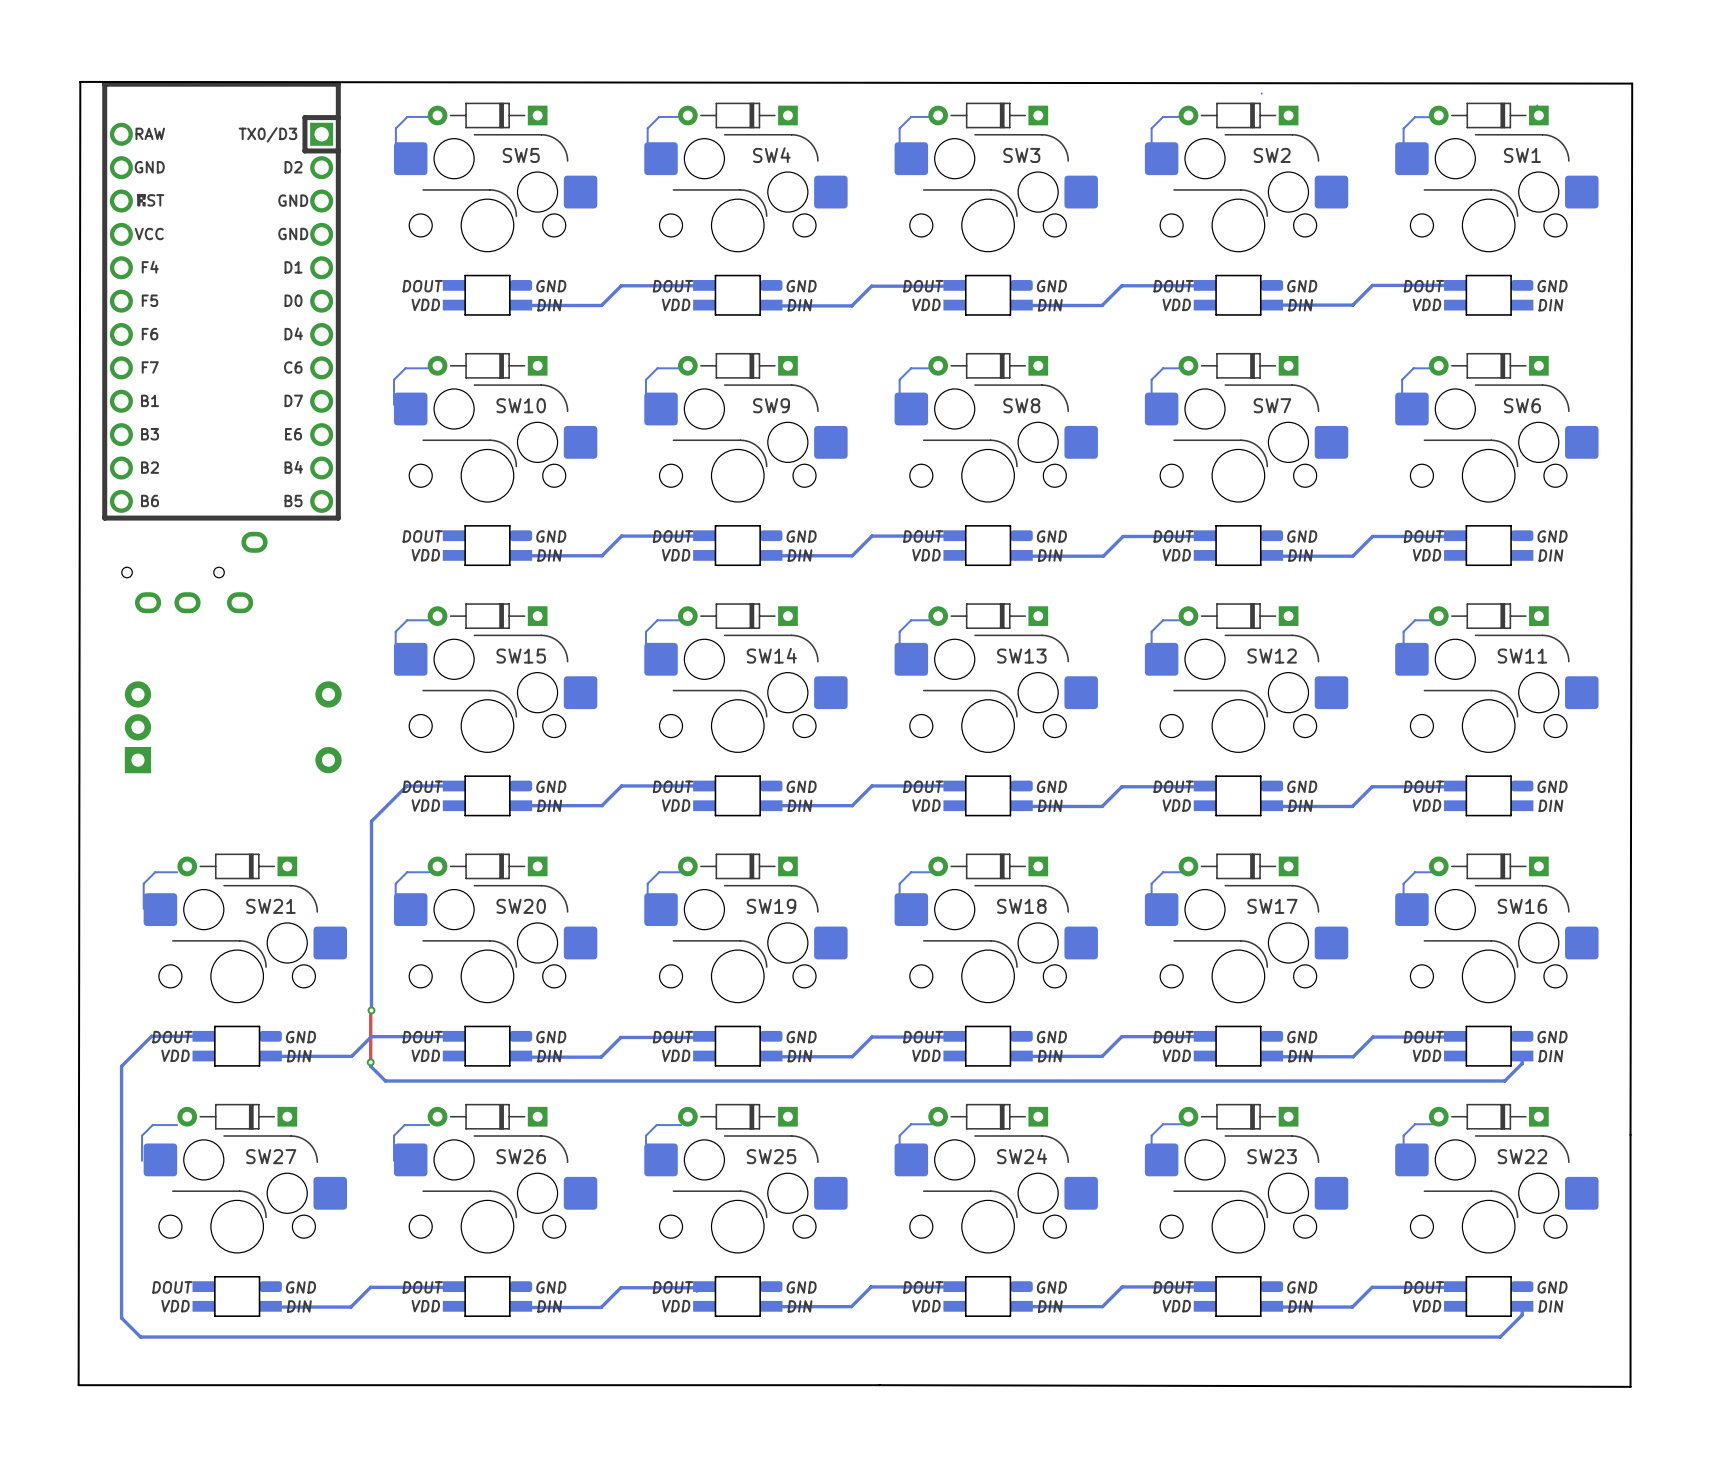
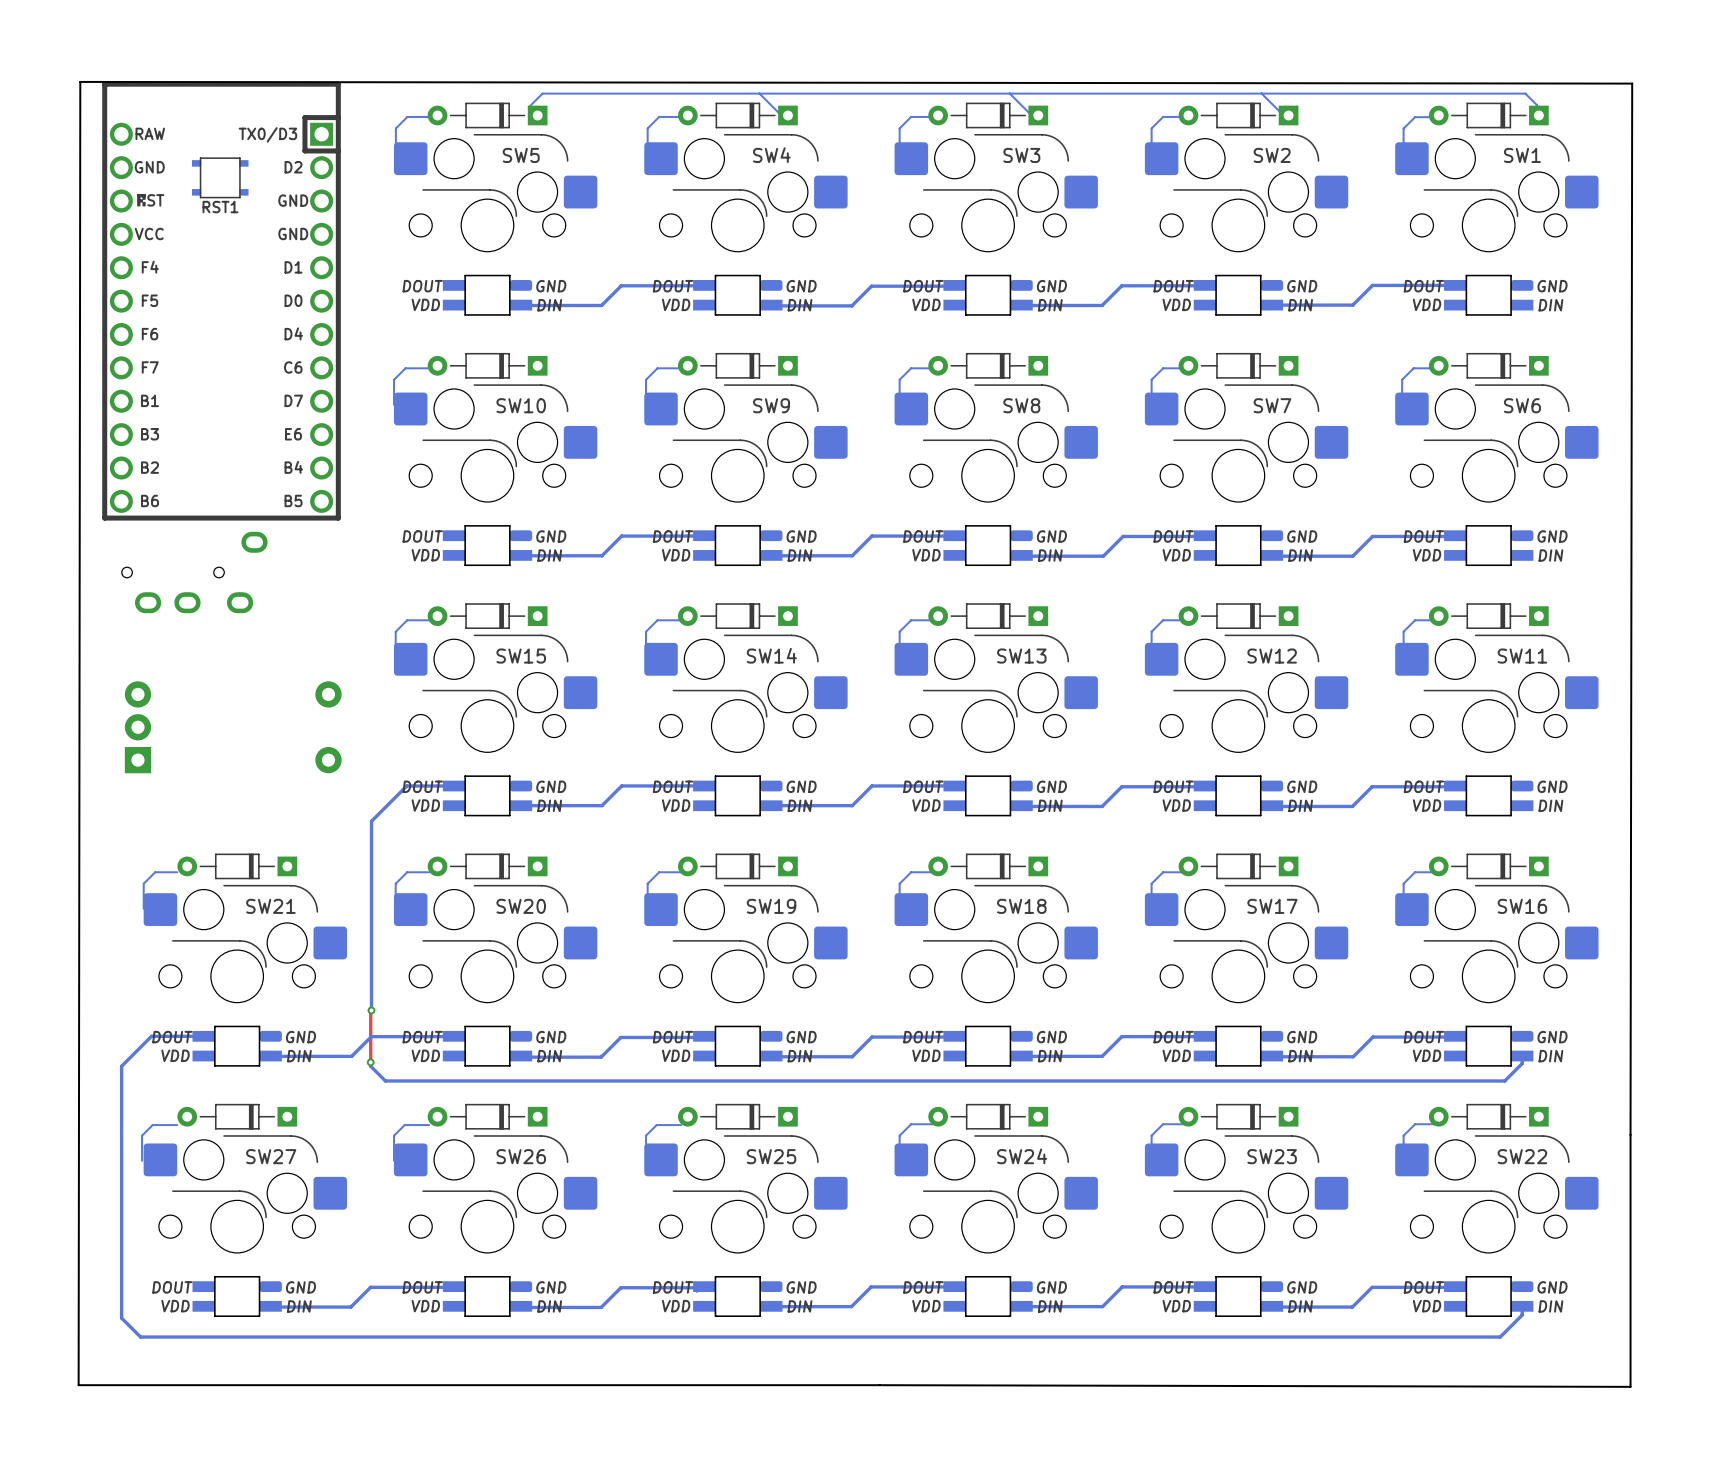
bottom track: none -> (759, 93) (781, 115)
bottom track: none -> (1009, 93) (1033, 117)
bottom track: none -> (1261, 93) (1285, 117)
bottom track: none -> (1537, 105) (1525, 93) (542, 93) (529, 106)
RST1: none -> (220, 177)

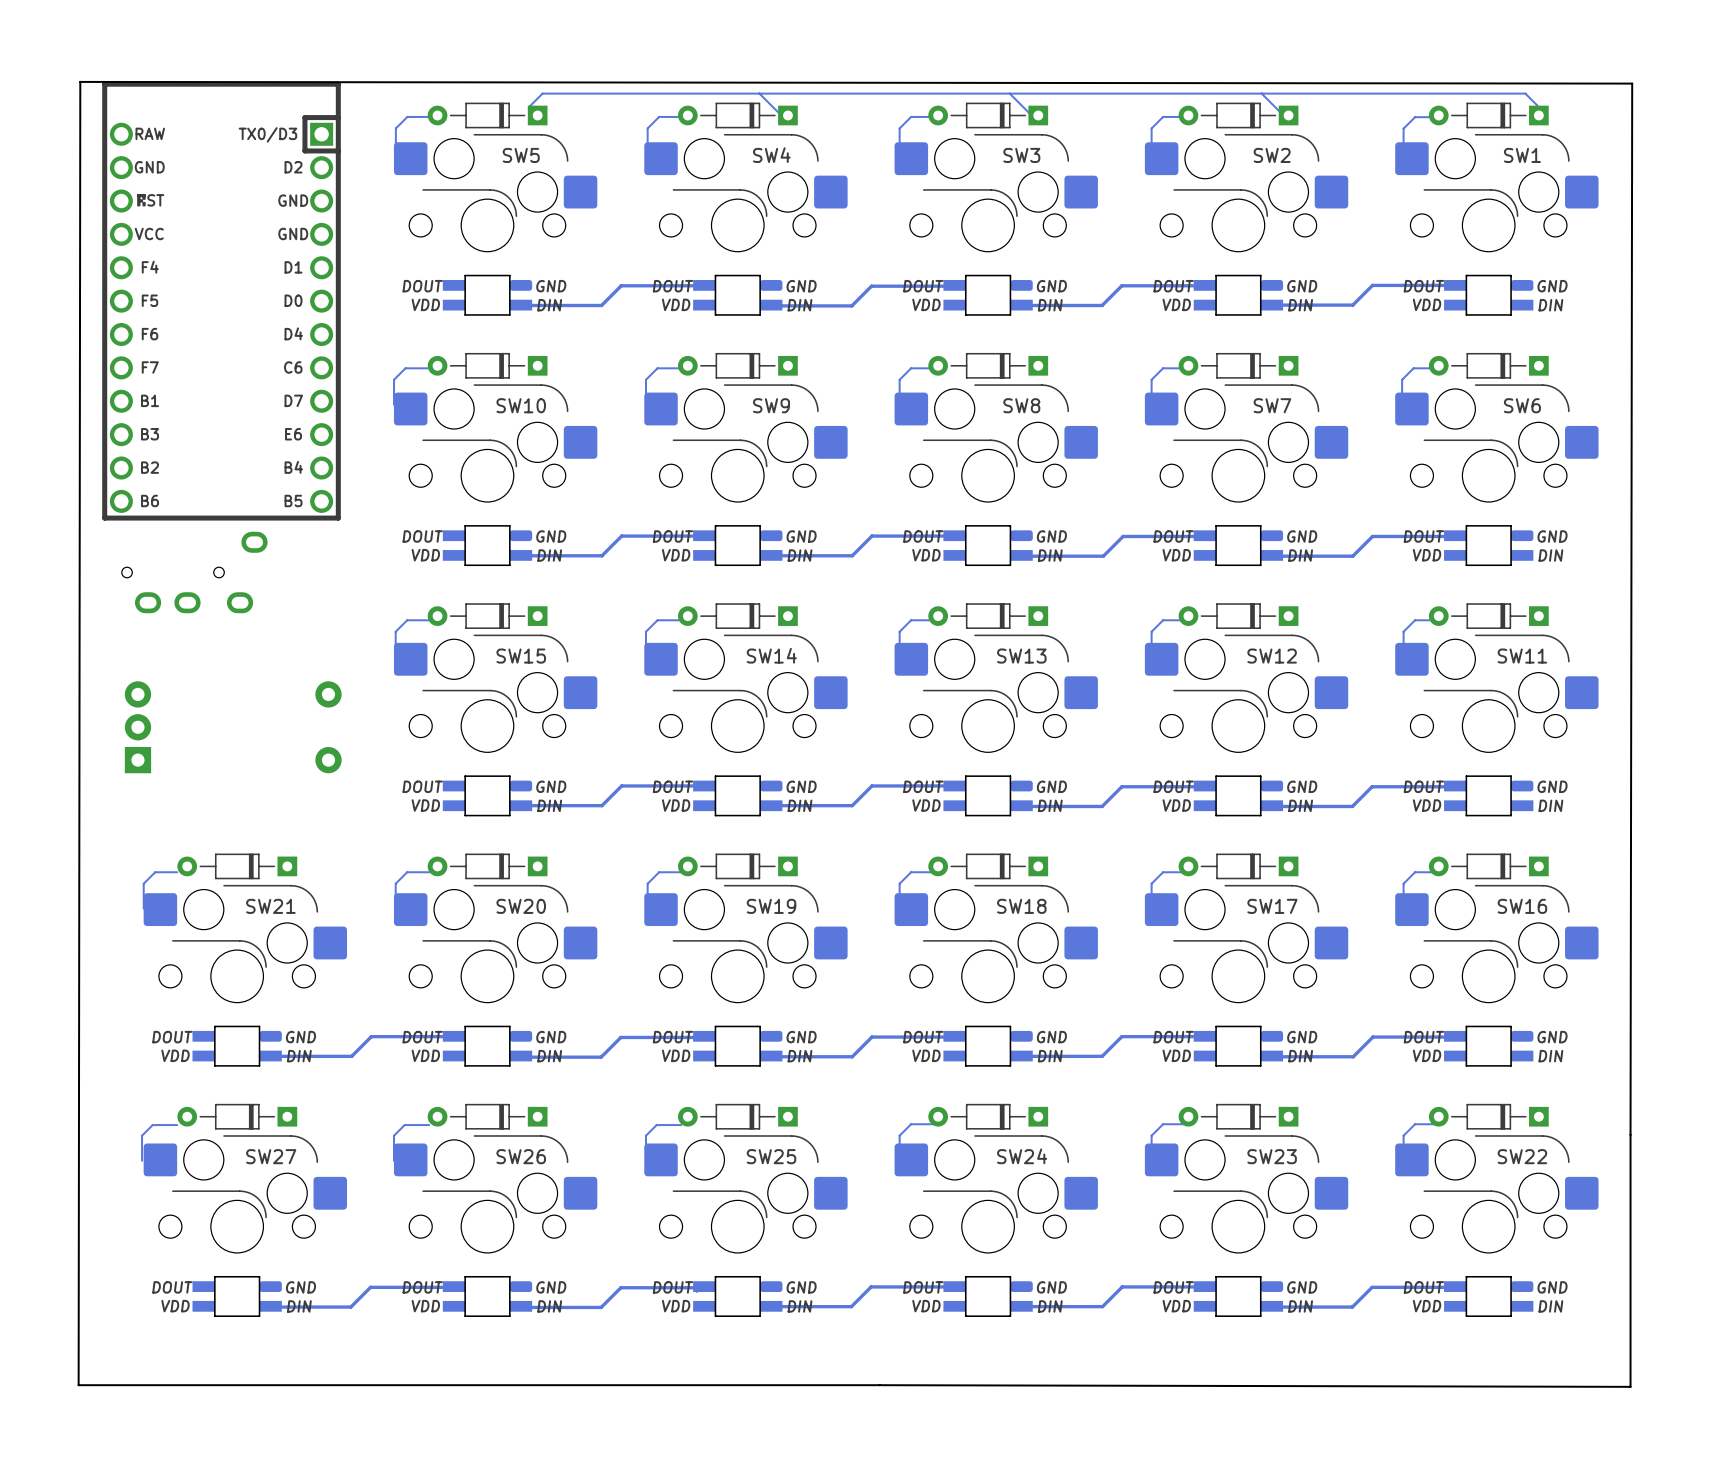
RST1: (220, 177) -> none
bottom track: (453, 786) (406, 786) (371, 821) (371, 1010) -> none
top track: (371, 1010) (370, 1062) -> none
via: (371, 1010) -> none
bottom track: (203, 1036) (151, 1036) (121, 1066) (121, 1318) (140, 1337) (1500, 1337) (1522, 1315) (1522, 1306) -> none
bottom track: (1522, 1056) (1522, 1063) (1504, 1080) (385, 1080) (370, 1066) (370, 1062) -> none
via: (370, 1062) -> none

